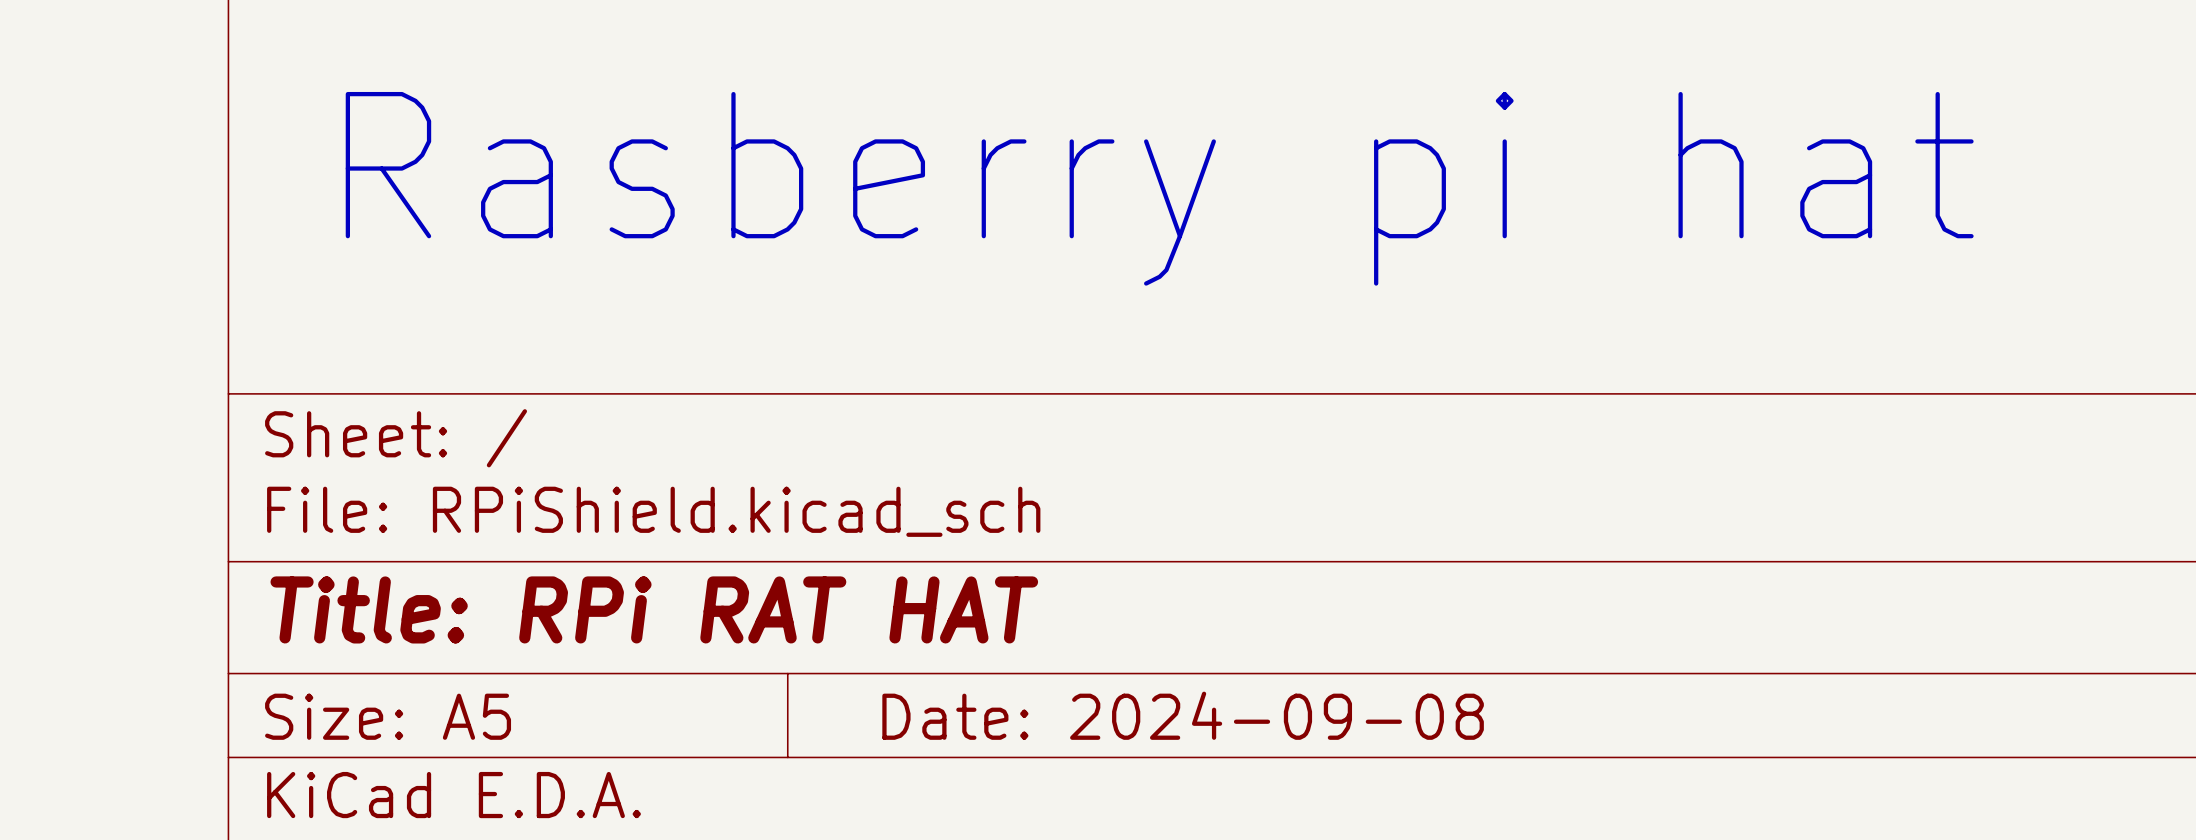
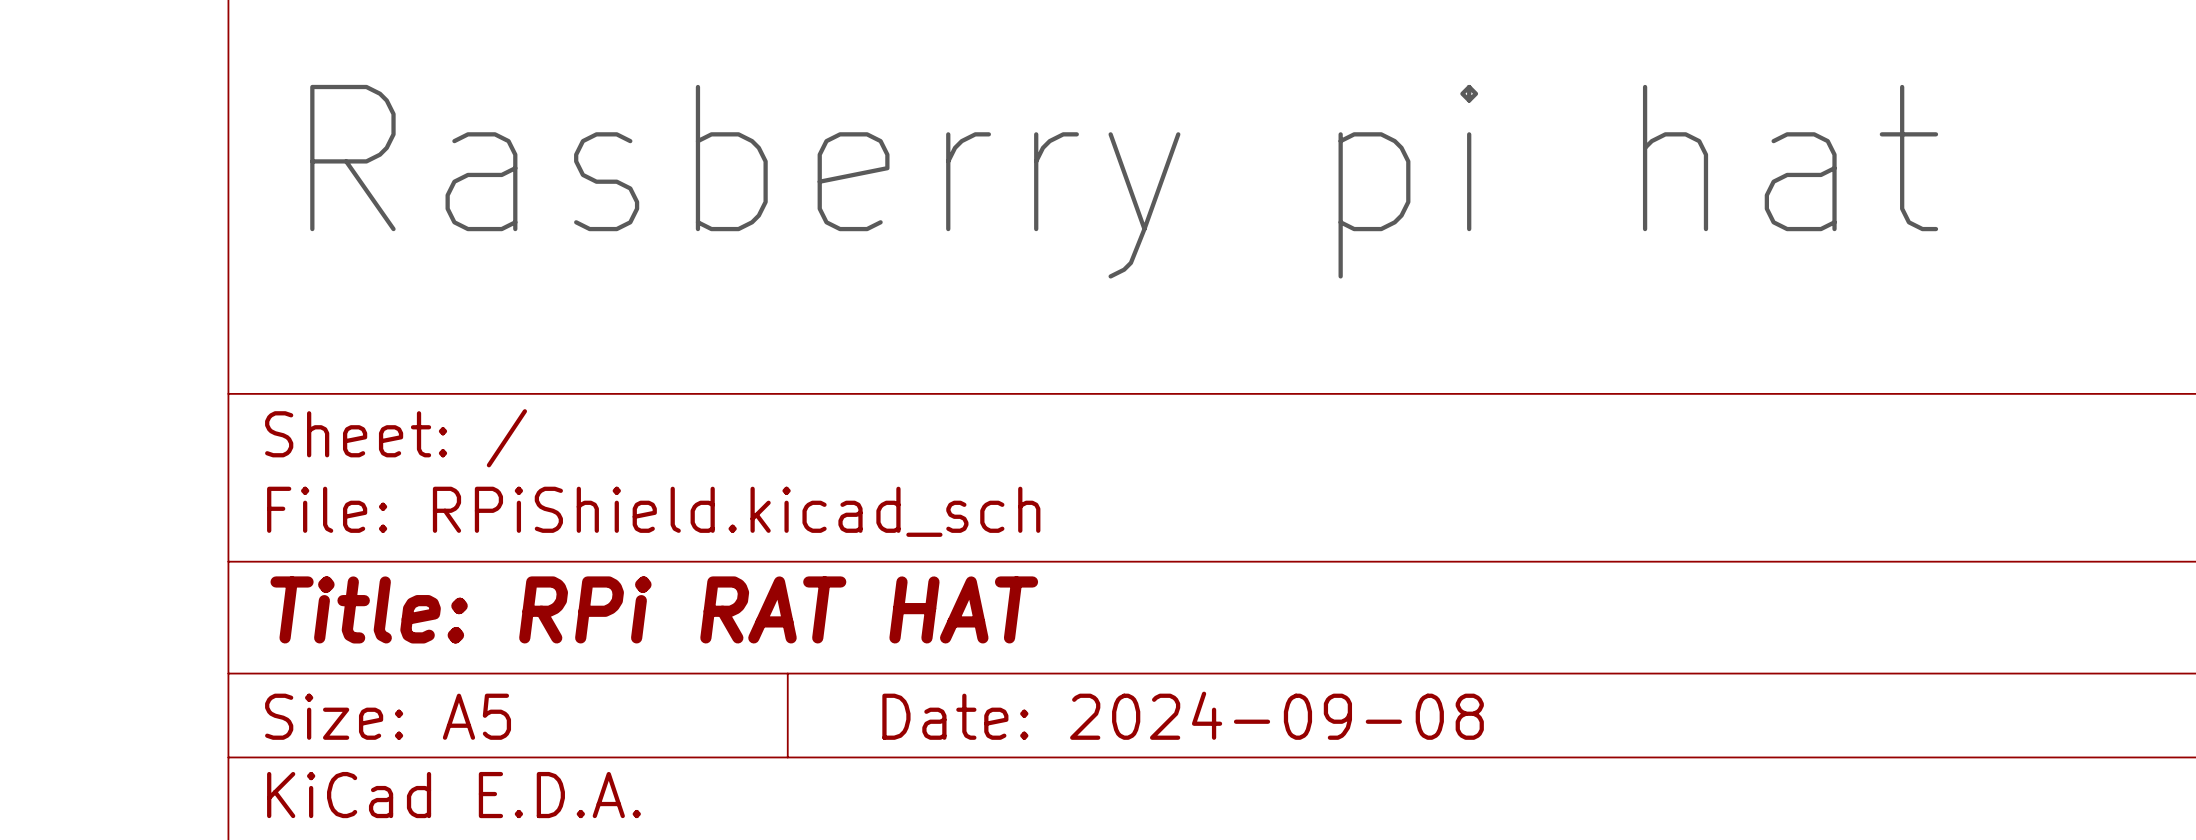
text position: Rasberry pi hat (1159, 188) -> Rasberry pi hat (1124, 181)

